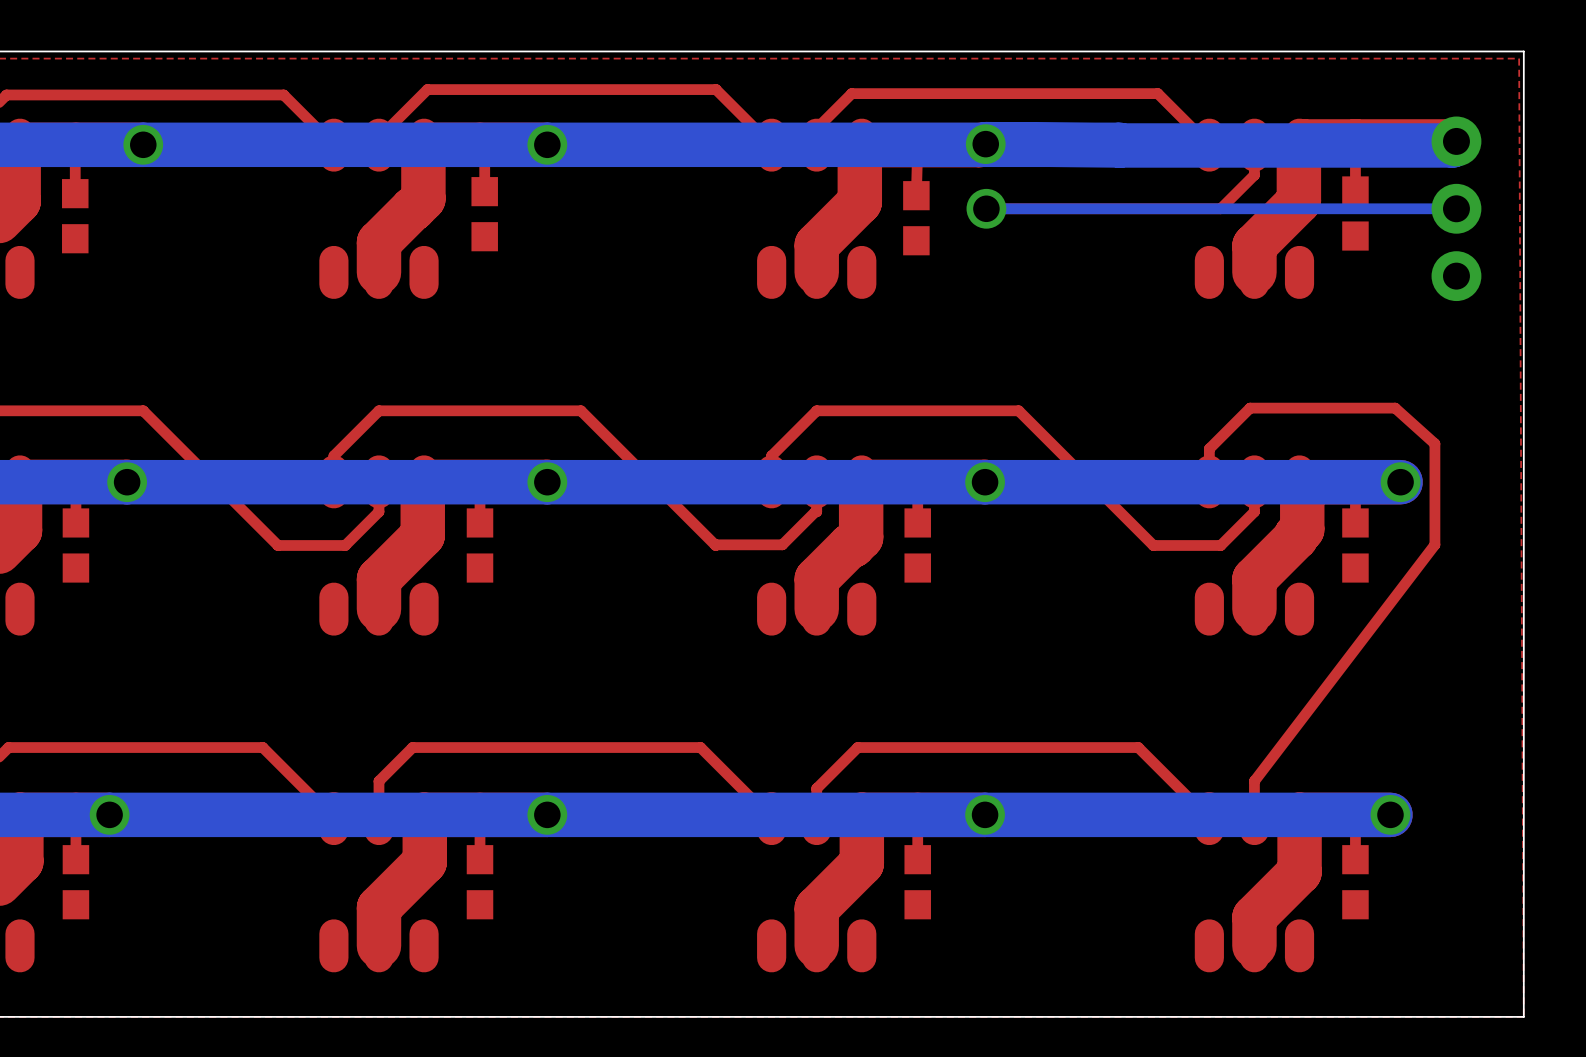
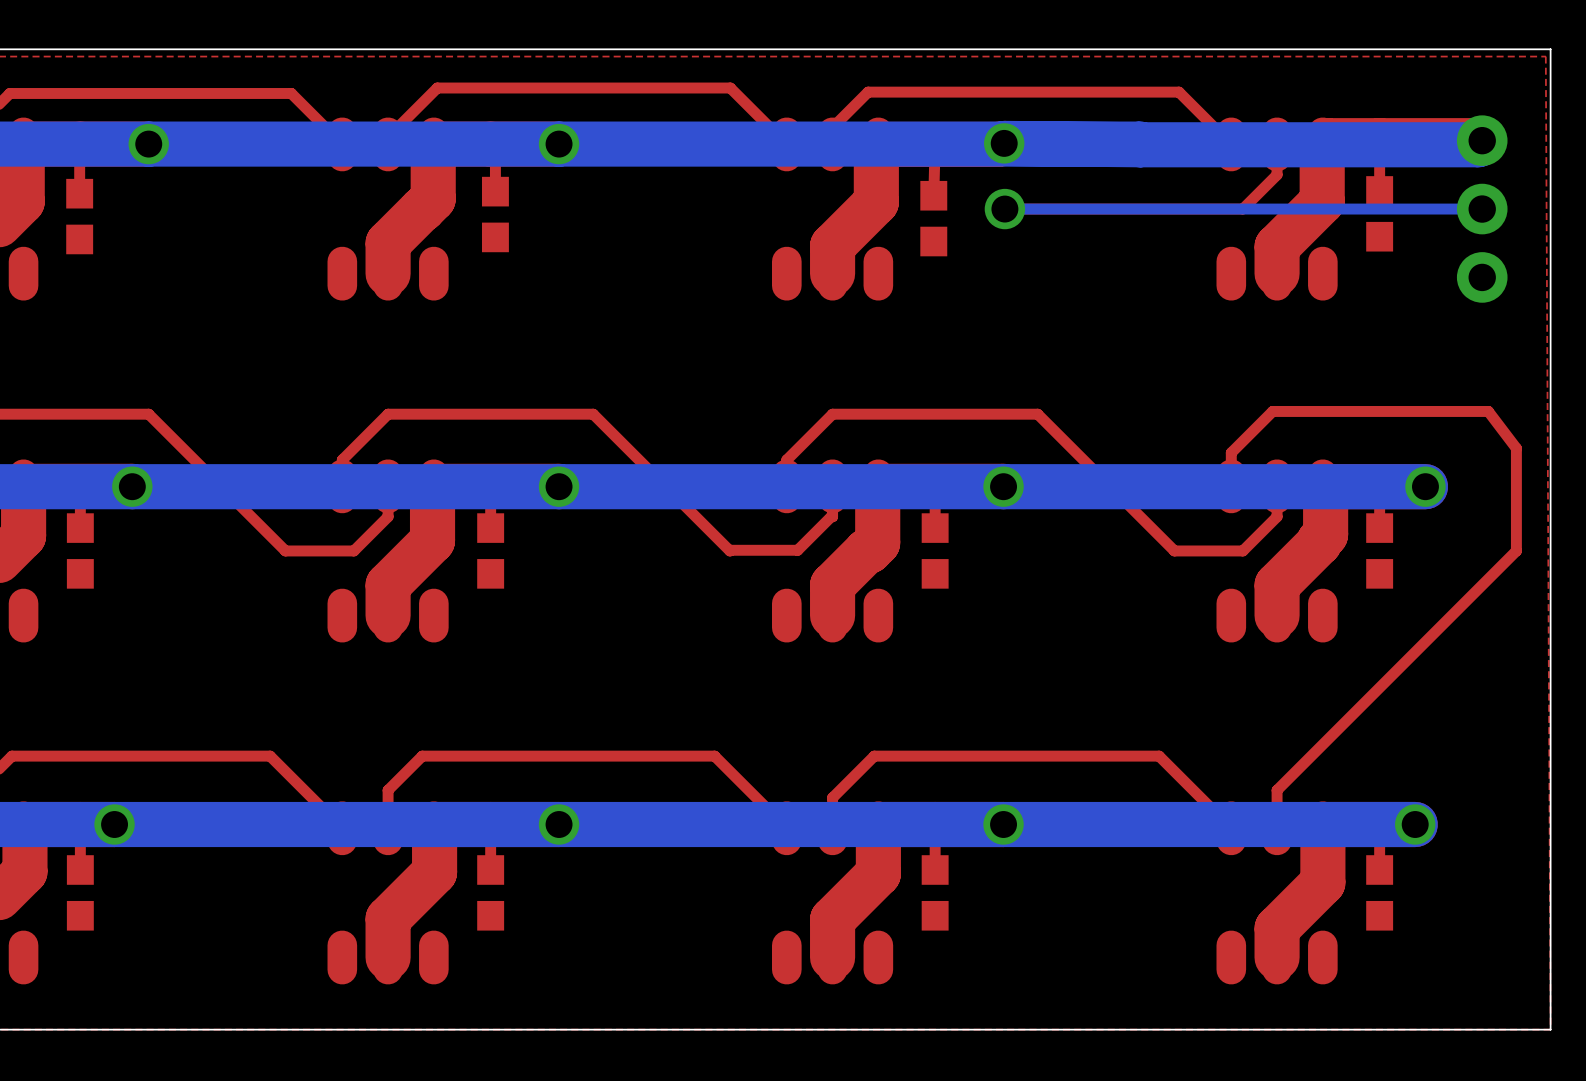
top track: (1395, 408) (1434, 443) (1434, 544) (1254, 781) -> (1419, 411) (1488, 411) (1516, 448) (1516, 550) (1277, 790)

